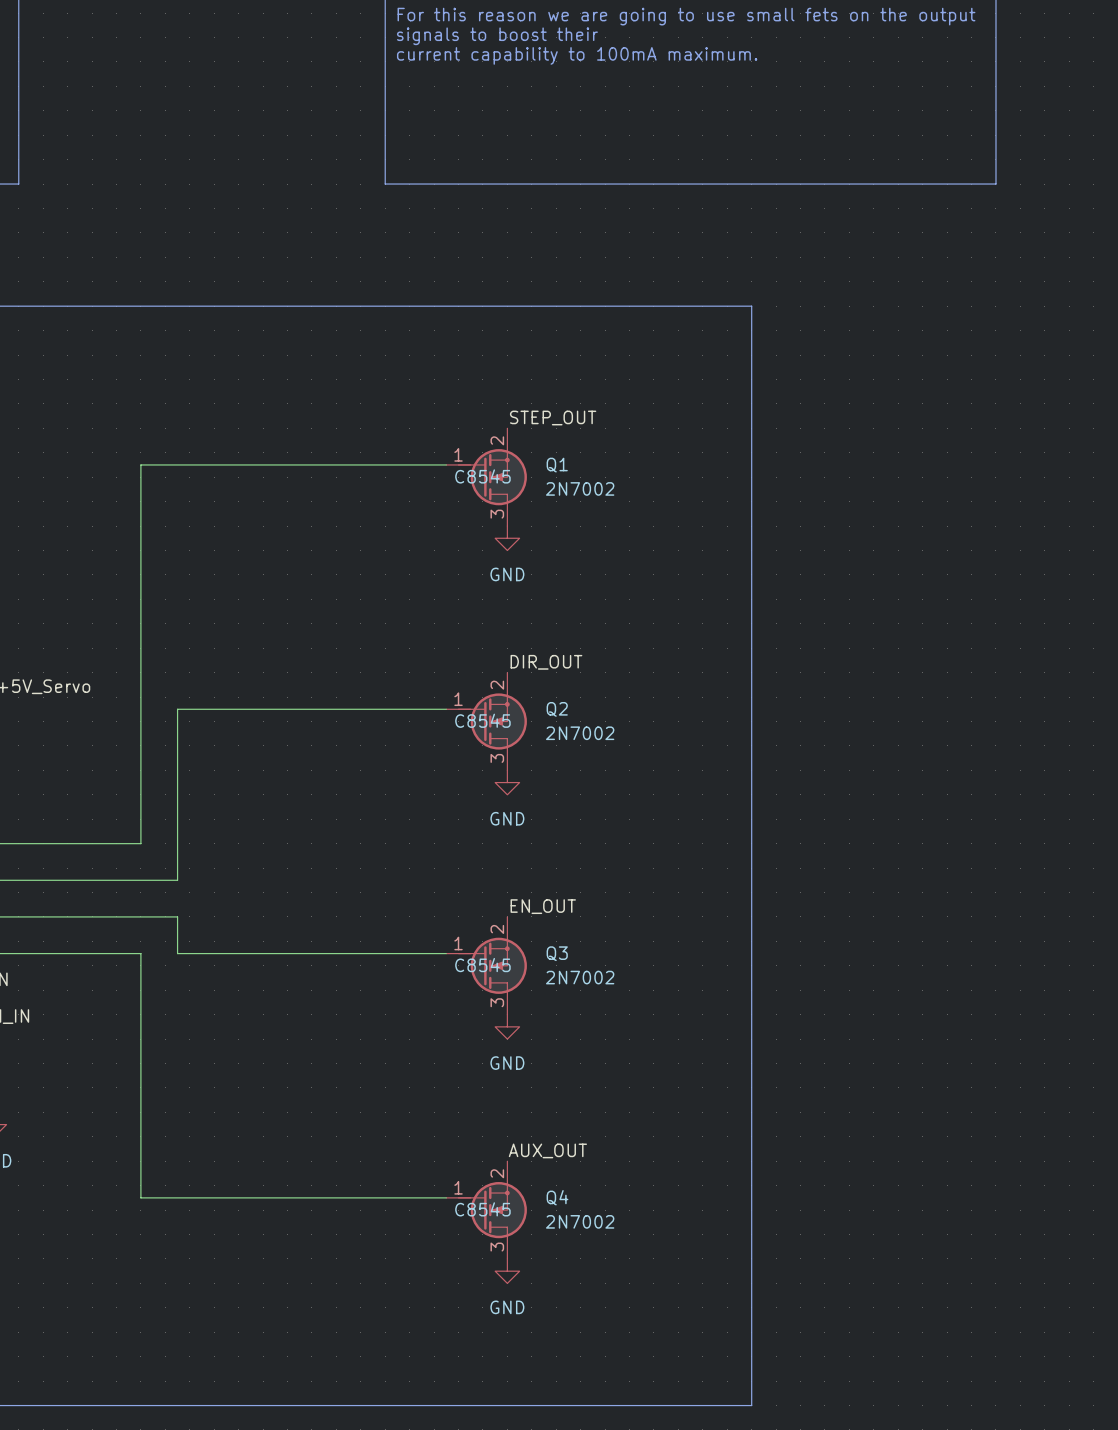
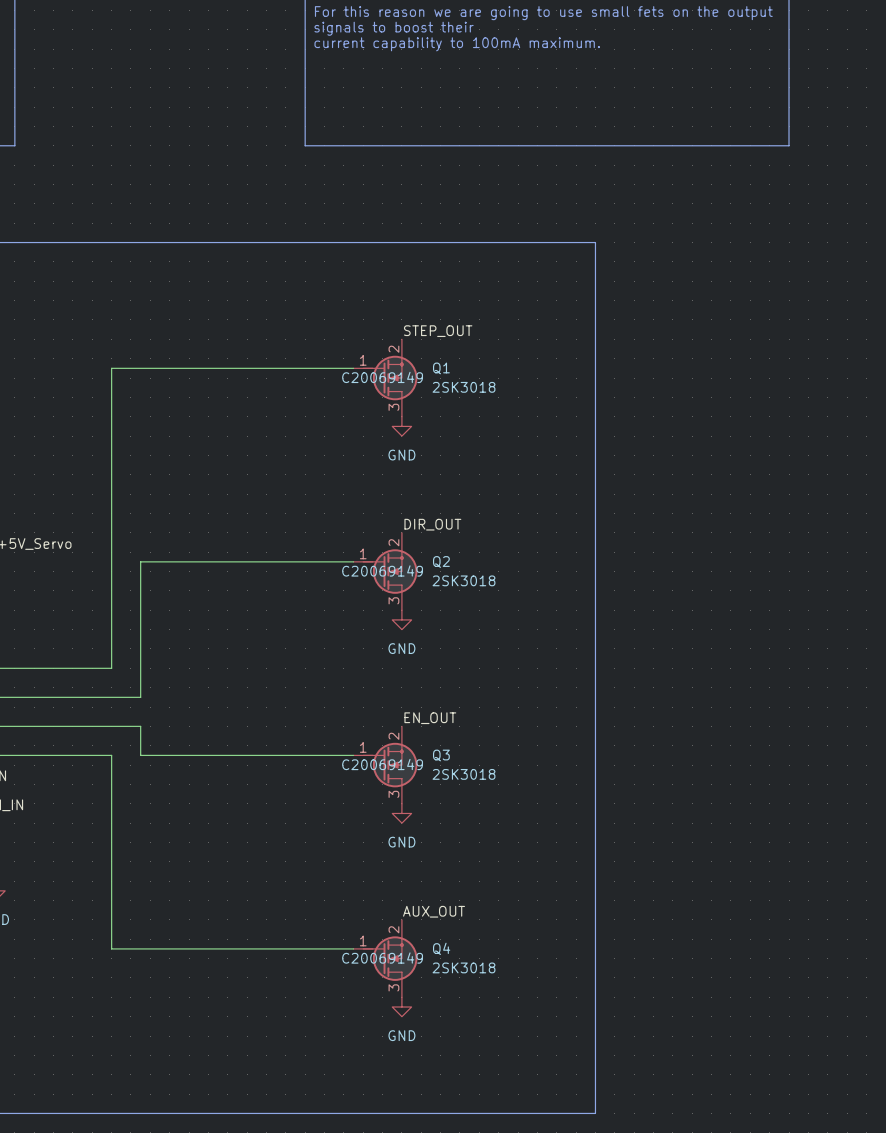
Q1 text: C8545 (482, 476) -> C20069149 (382, 377)
Q1 value: 2N7002 (580, 488) -> 2SK3018 (463, 387)
Q2 text: C8545 (482, 720) -> C20069149 (382, 570)
Q2 value: 2N7002 (580, 733) -> 2SK3018 (463, 580)
Q3 text: C8545 (482, 965) -> C20069149 (382, 764)
Q3 value: 2N7002 (580, 977) -> 2SK3018 (463, 774)
Q4 text: C8545 (482, 1209) -> C20069149 (382, 958)
Q4 value: 2N7002 (580, 1221) -> 2SK3018 (463, 967)

